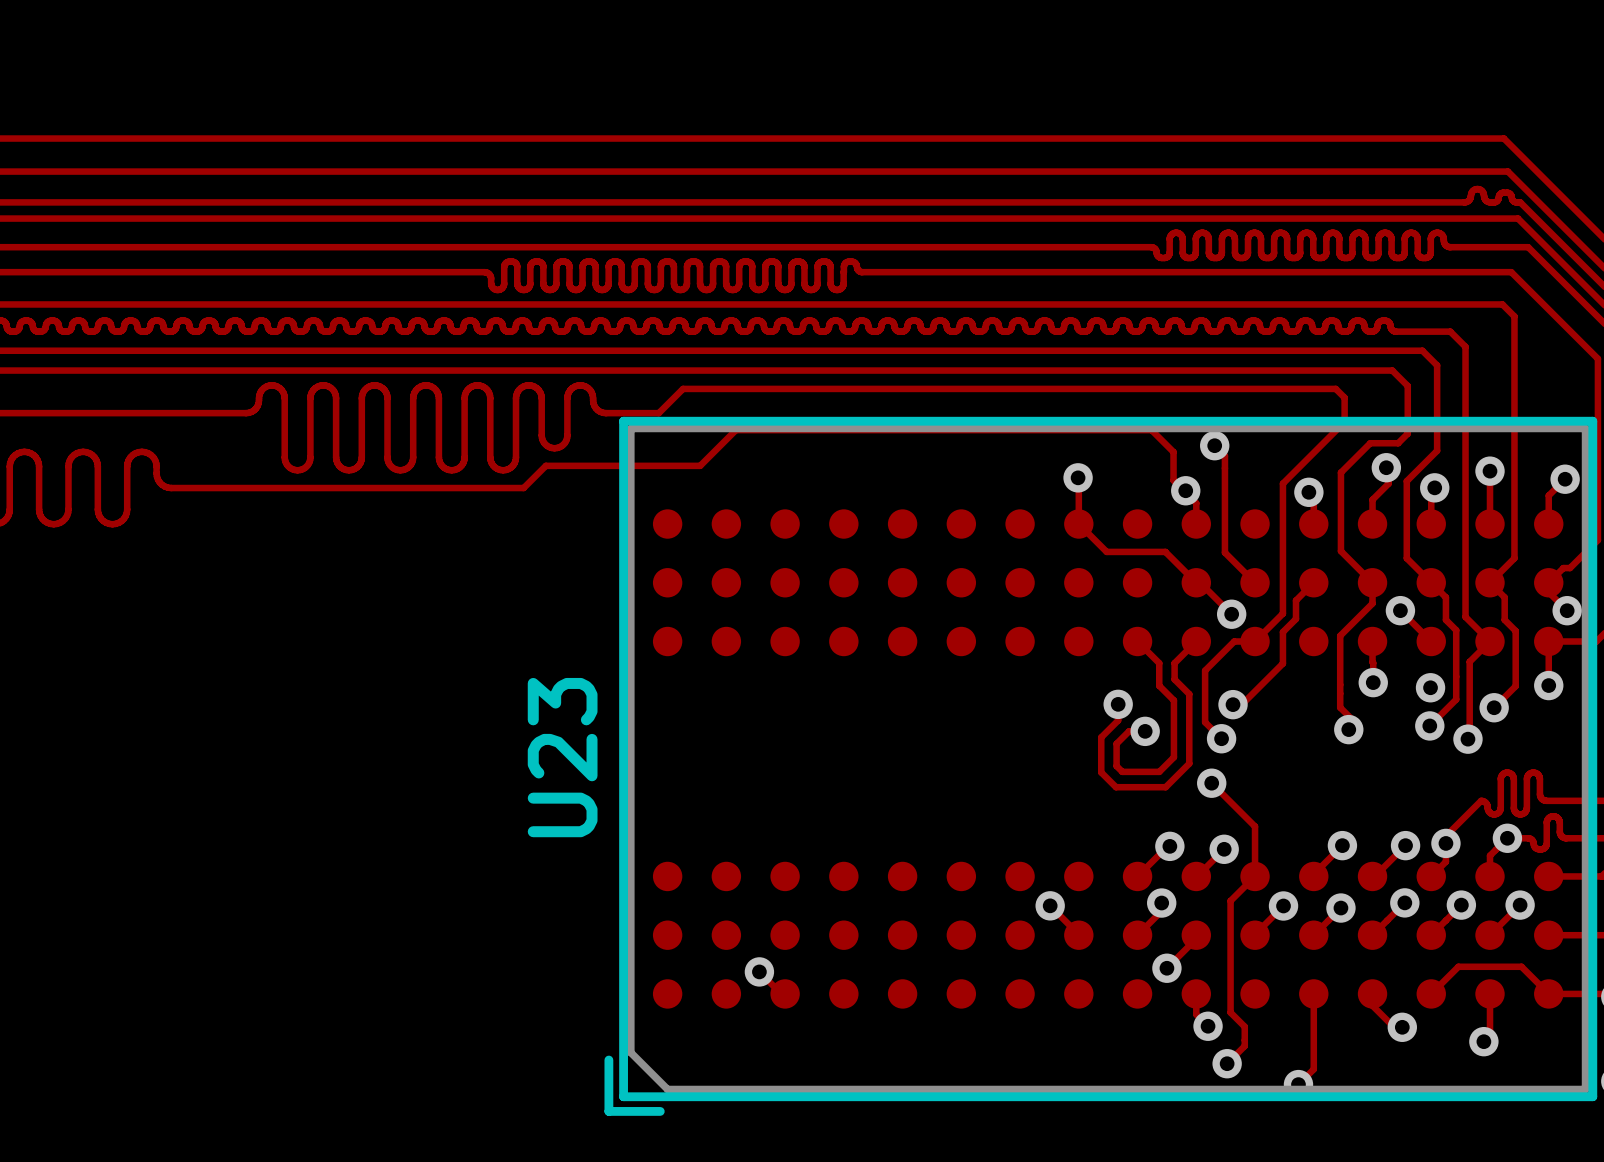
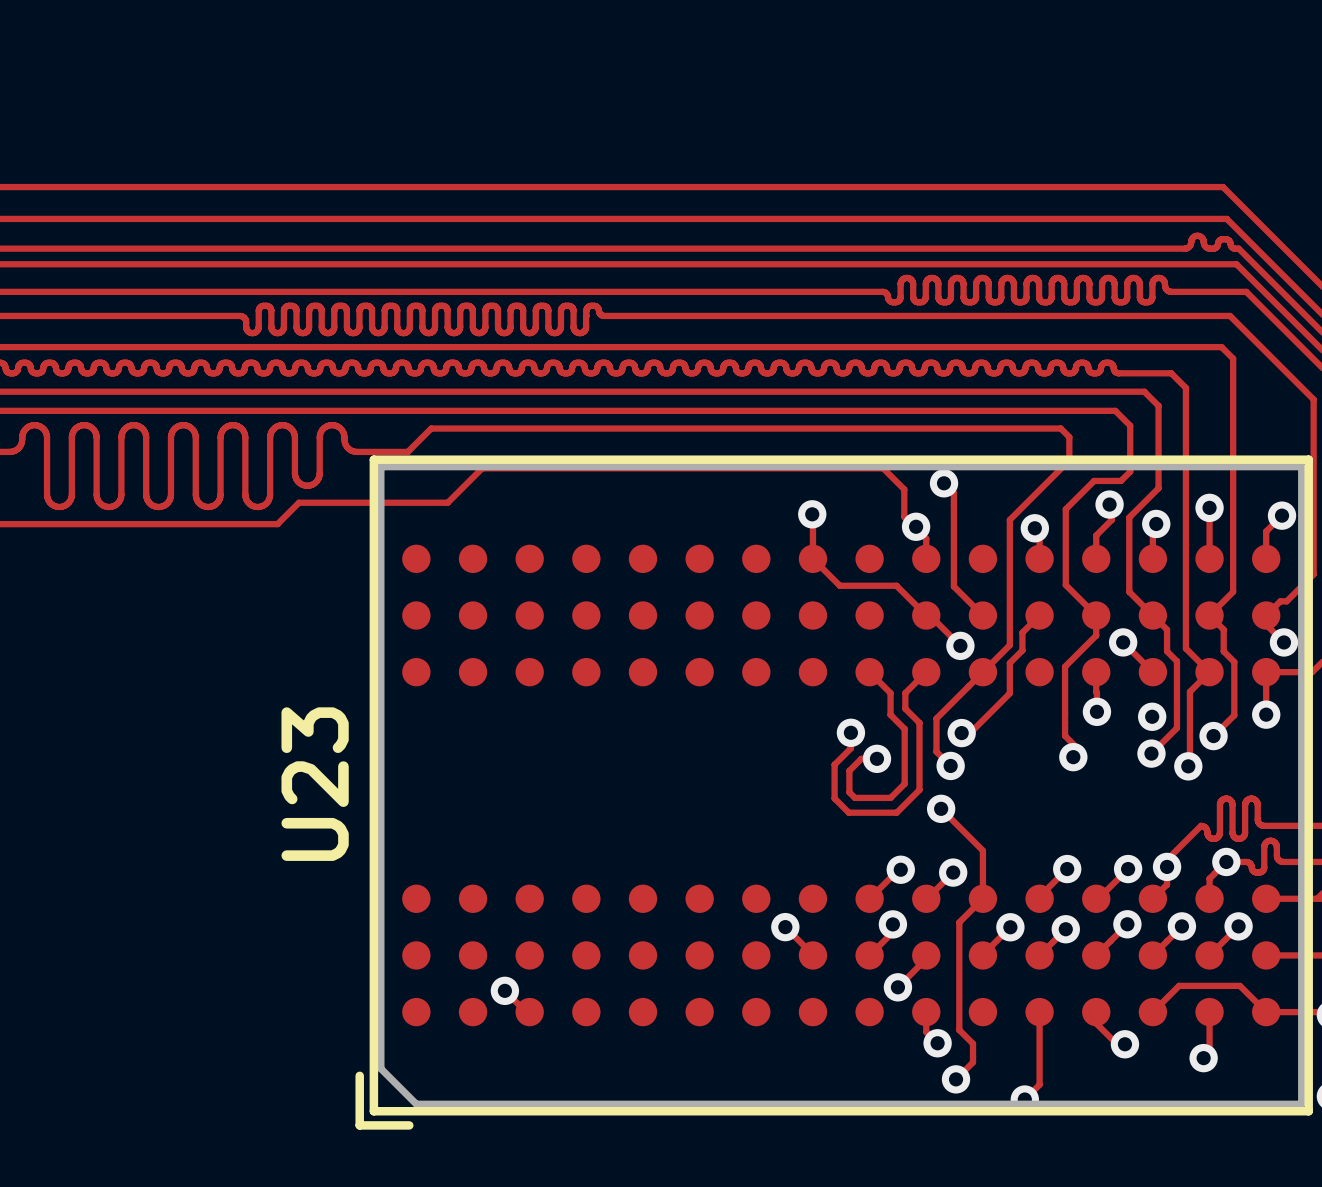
track: (1255, 641) (1234, 641) (1205, 670) (1205, 722) (1206, 724) -> (982, 672) (936, 718) (936, 751)

